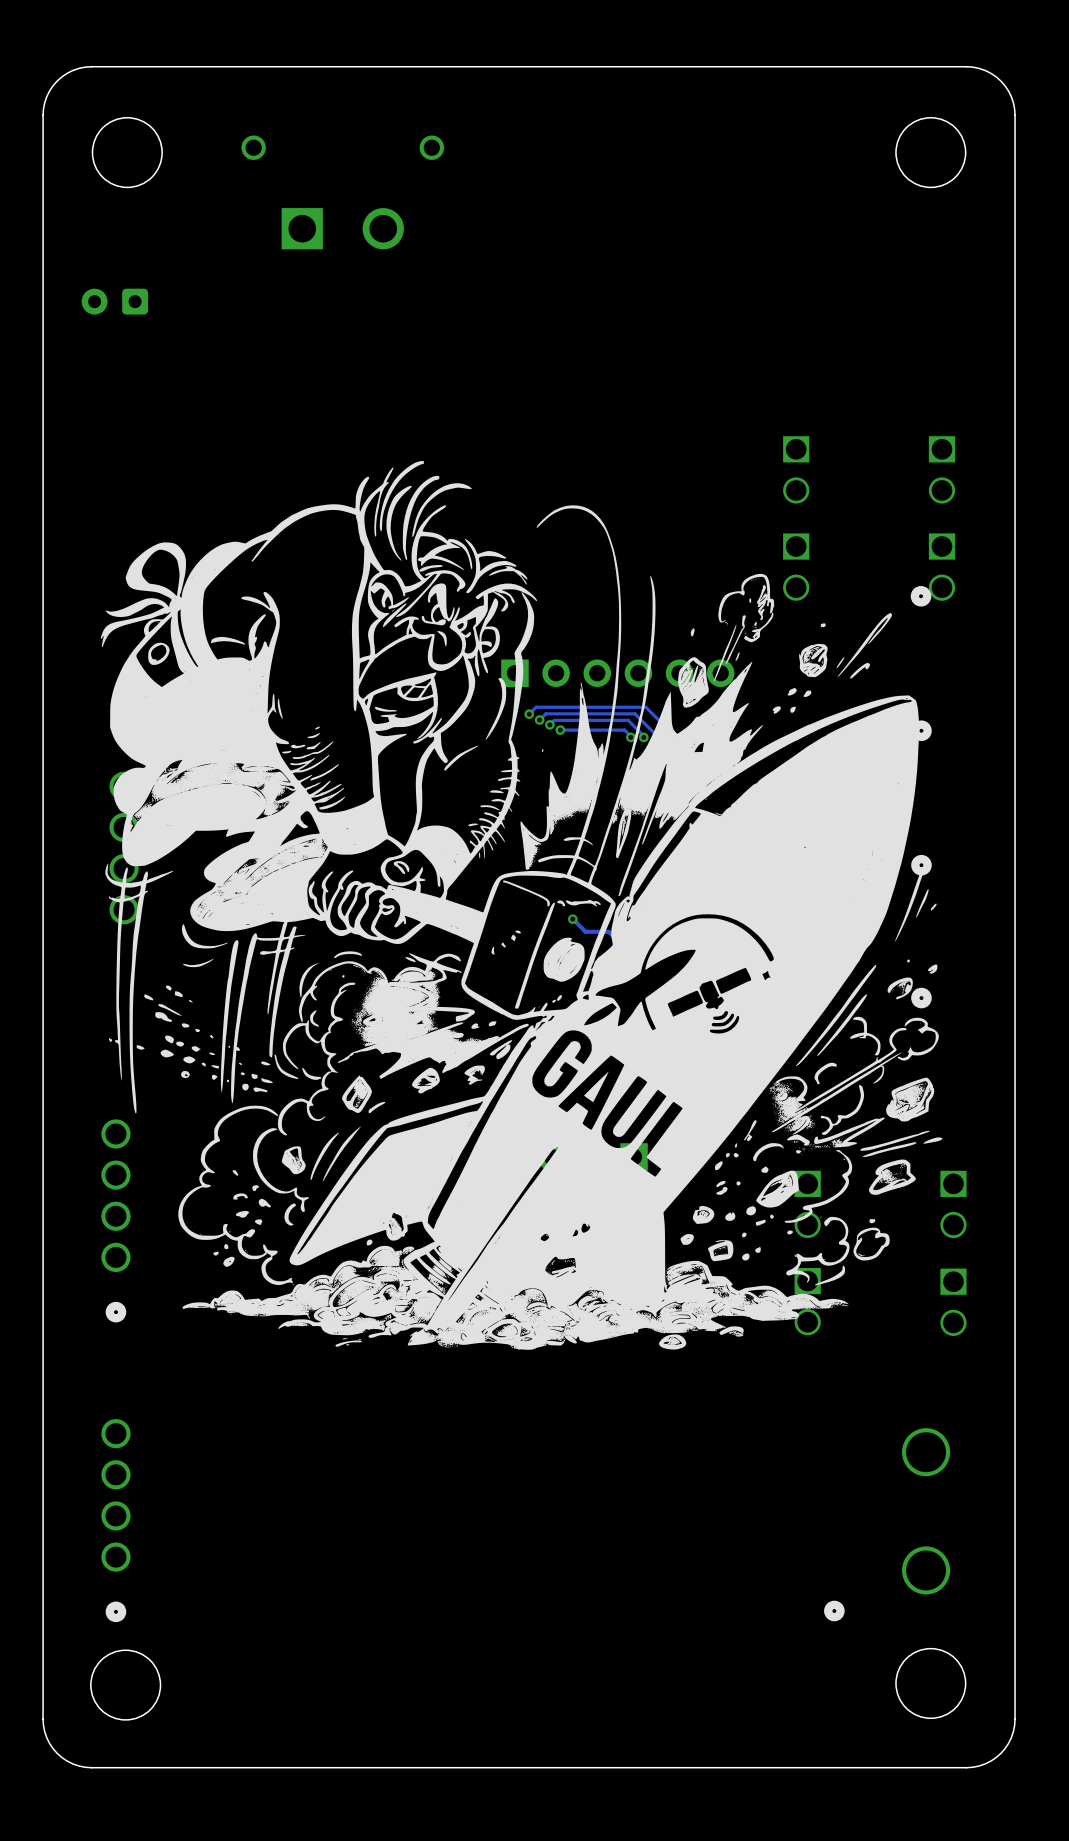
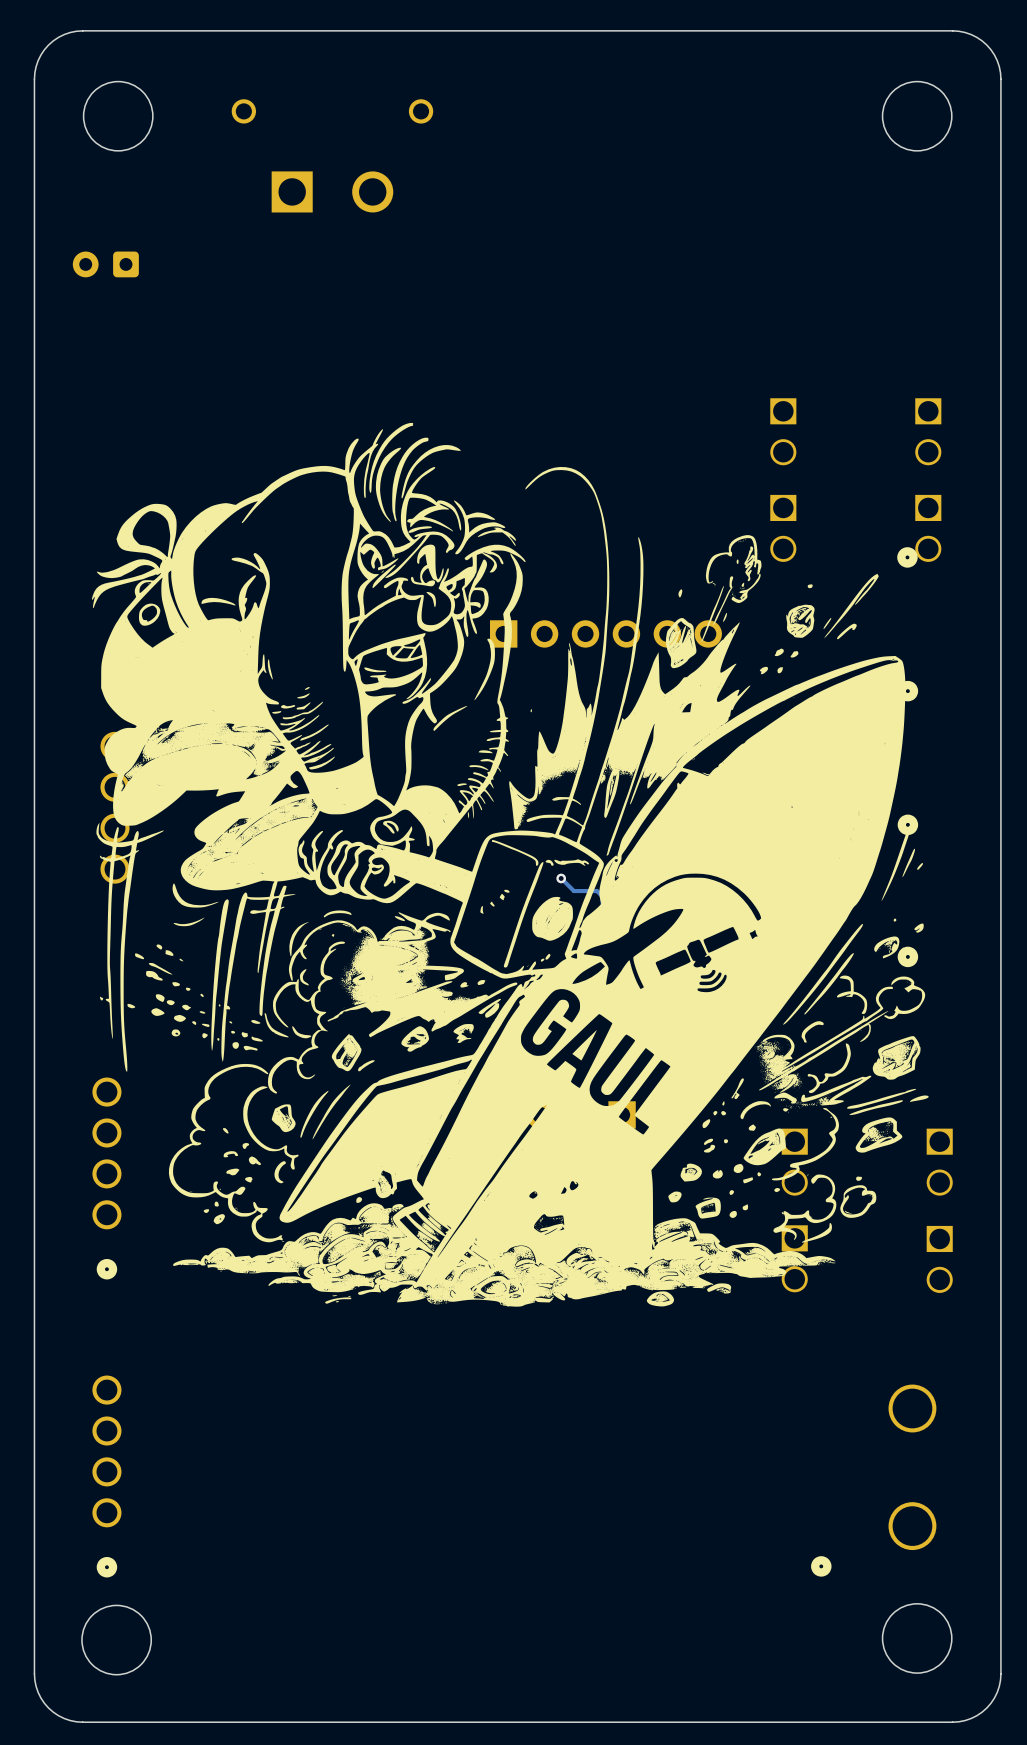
track: (529, 714) (536, 707) (645, 707) (672, 733) (672, 735) -> none
via: (529, 714) -> none
track: (539, 720) (545, 713) (634, 713) (658, 736) -> none
via: (539, 720) -> none
track: (549, 724) (554, 720) (628, 720) (645, 737) -> none
via: (549, 724) -> none
track: (560, 730) (624, 730) (631, 737) -> none
via: (560, 730) -> none
via: (630, 737) -> none
via: (643, 737) -> none

